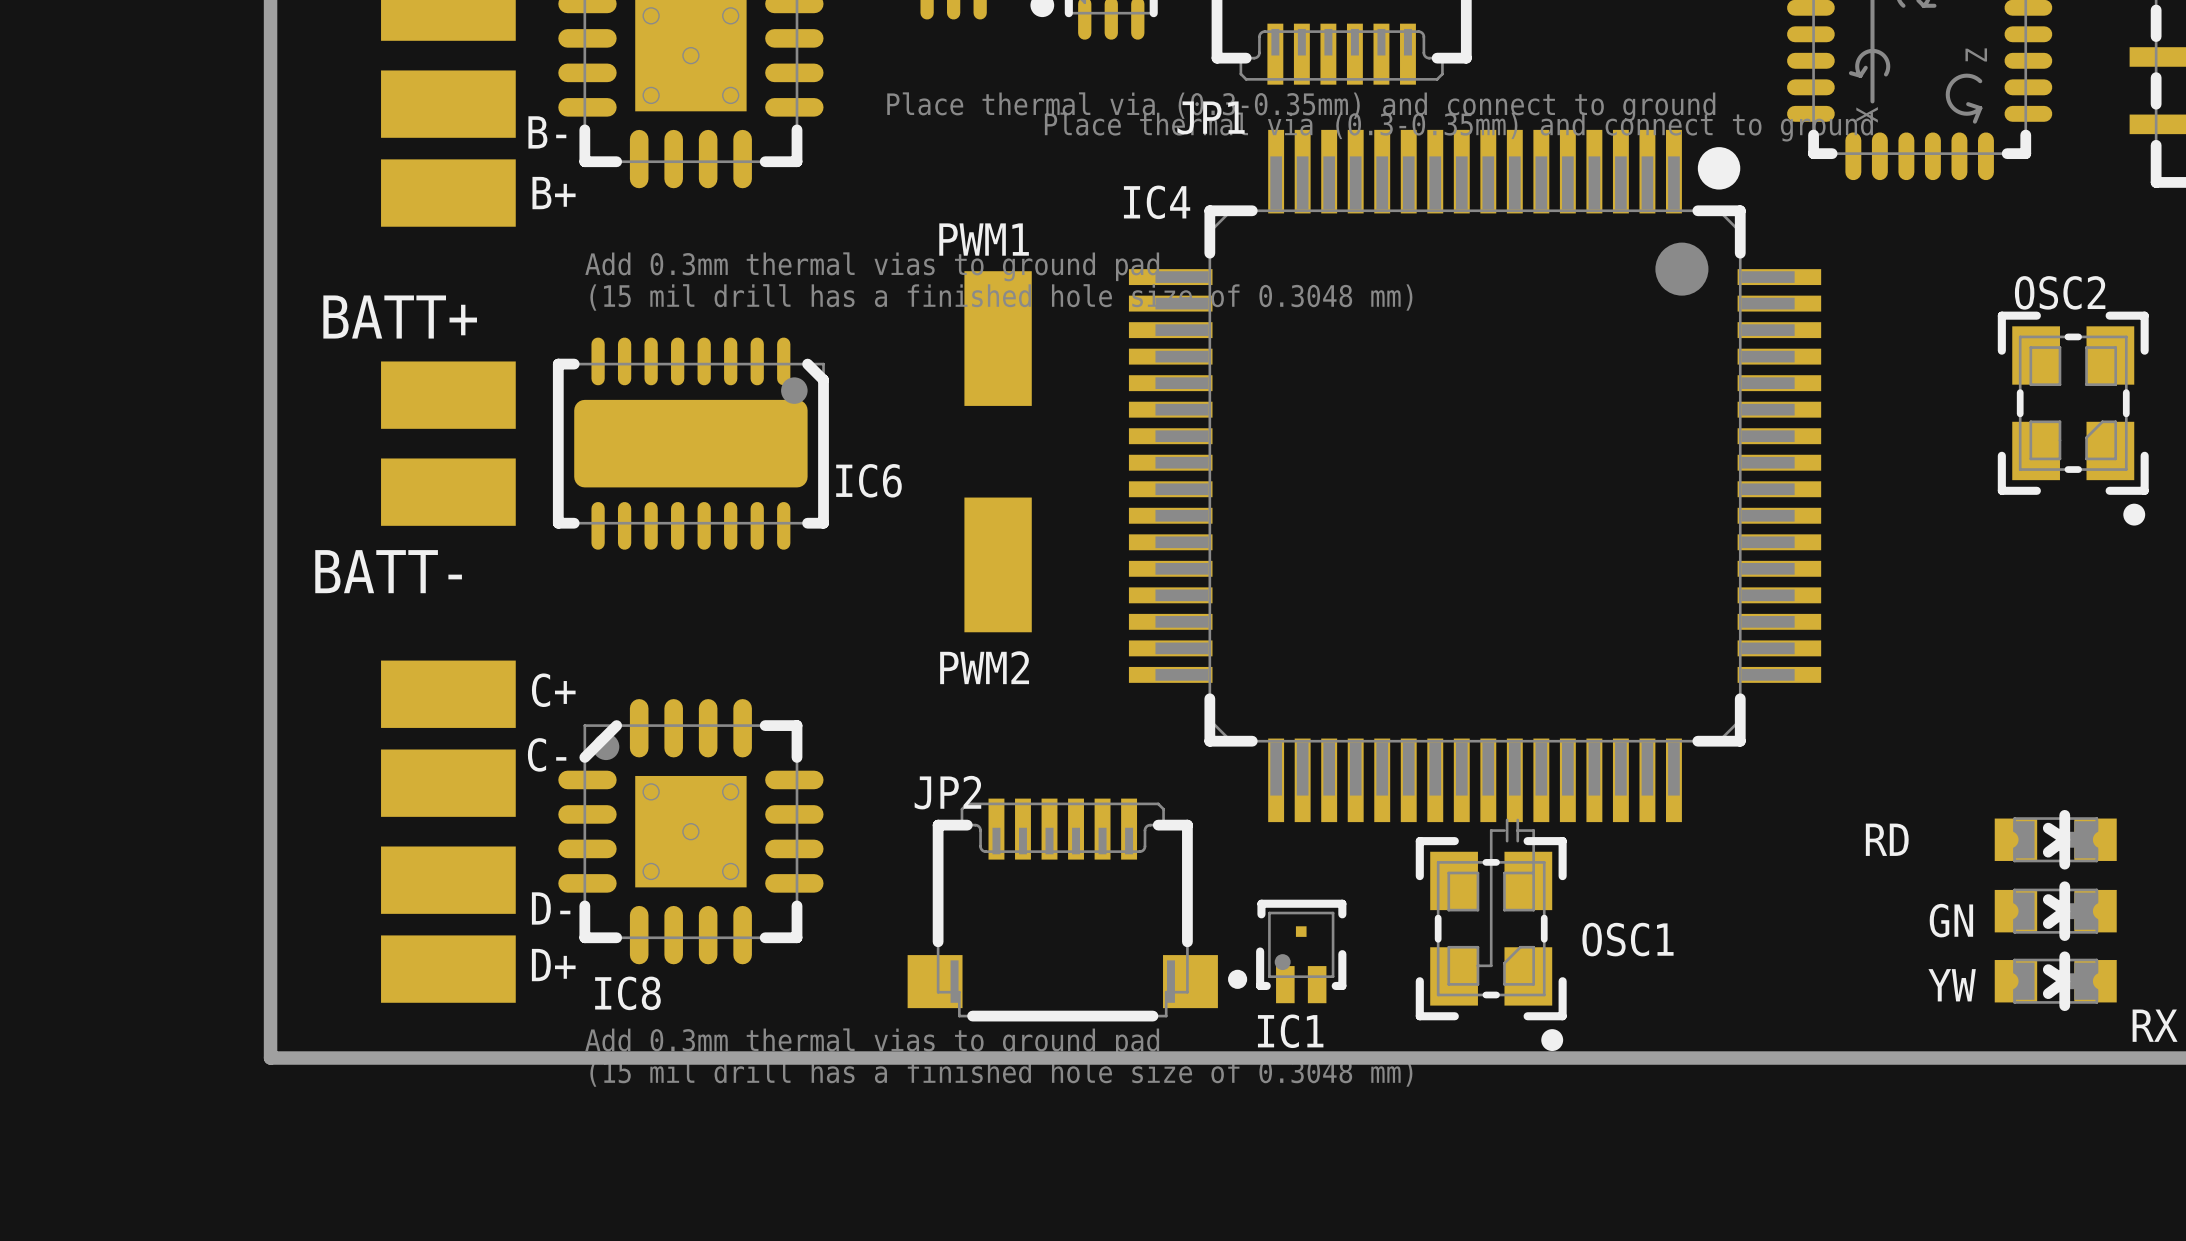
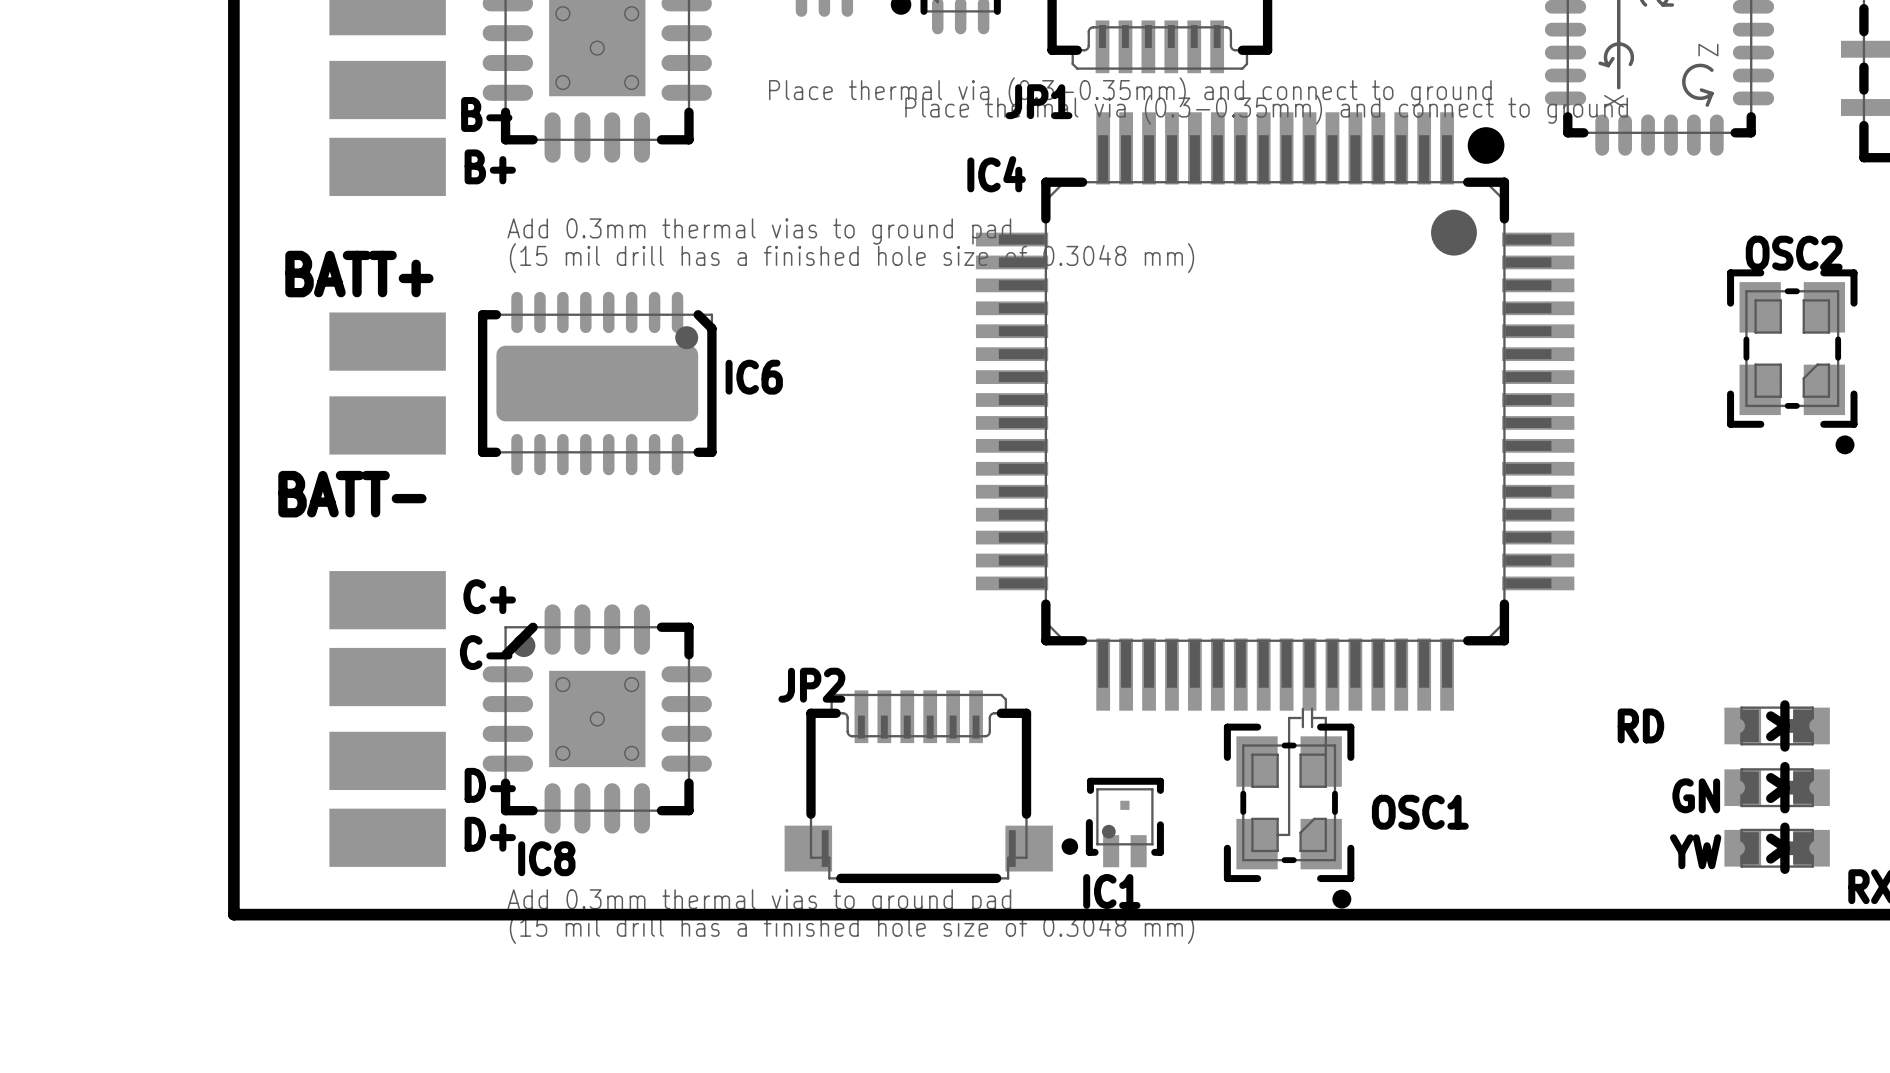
PWM1: (998, 338) -> none
IC6 name position: IC6 (868, 480) -> IC6 (754, 377)
PWM2: (998, 564) -> none

